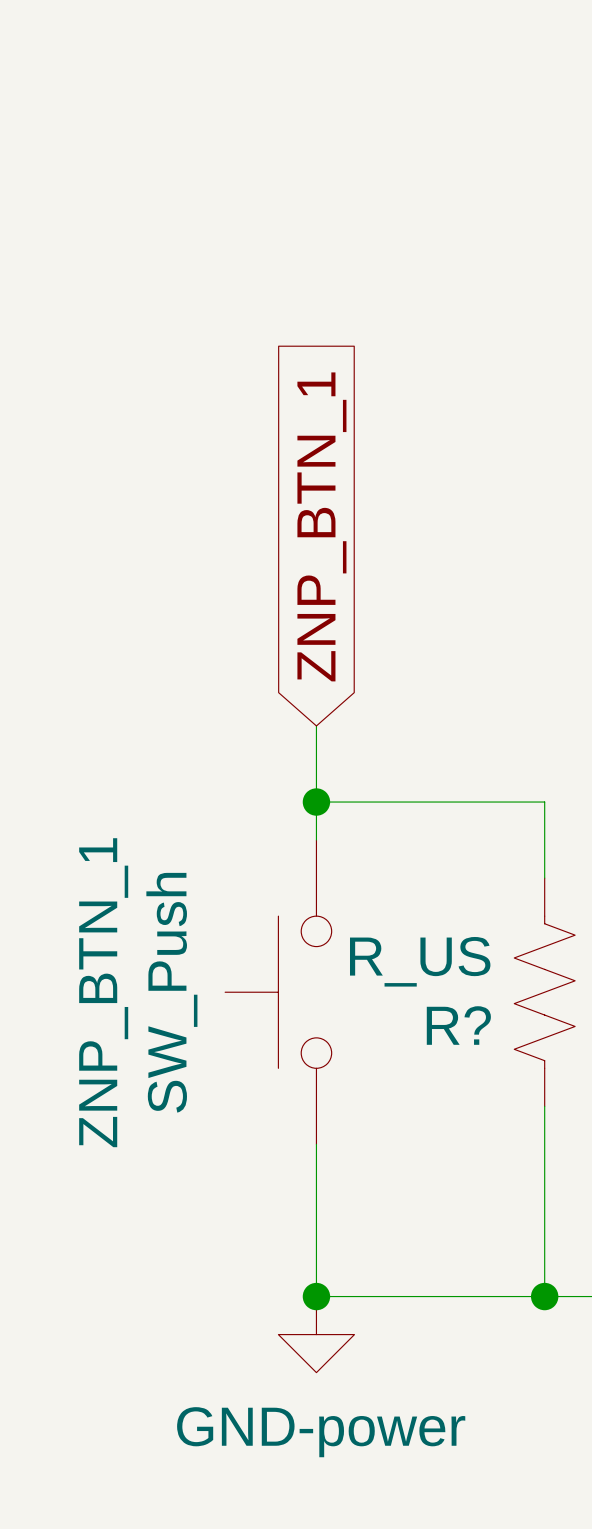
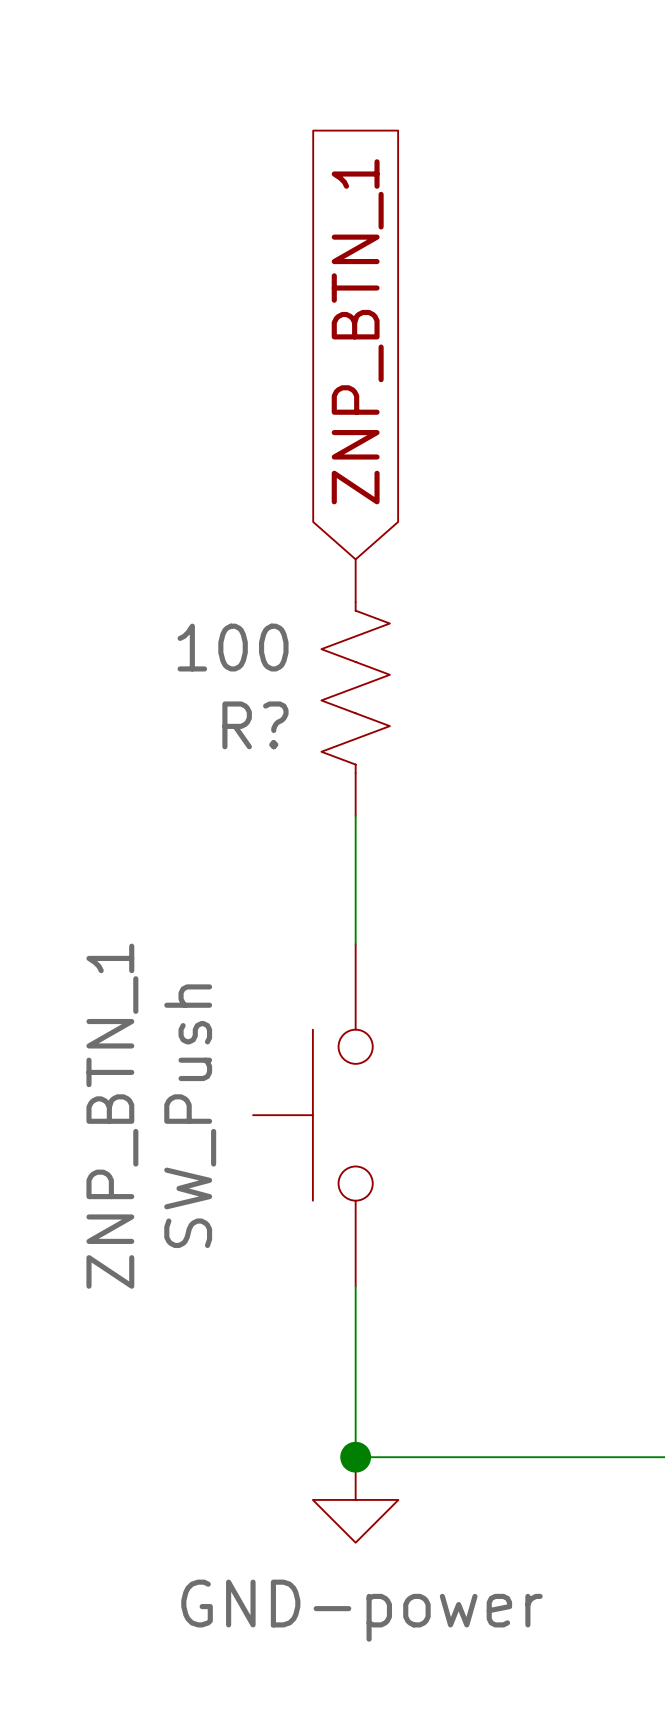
global label position: ZNP_BTN_1 (321, 526) -> ZNP_BTN_1 (357, 331)
R?: none -> 100 (355, 687)
wire: (316, 802) (544, 802) (544, 878) -> none
junction: (316, 802) -> none
R?: R_US (544, 992) -> none
wire: (544, 1106) (544, 1296) -> none
junction: (544, 1296) -> none

